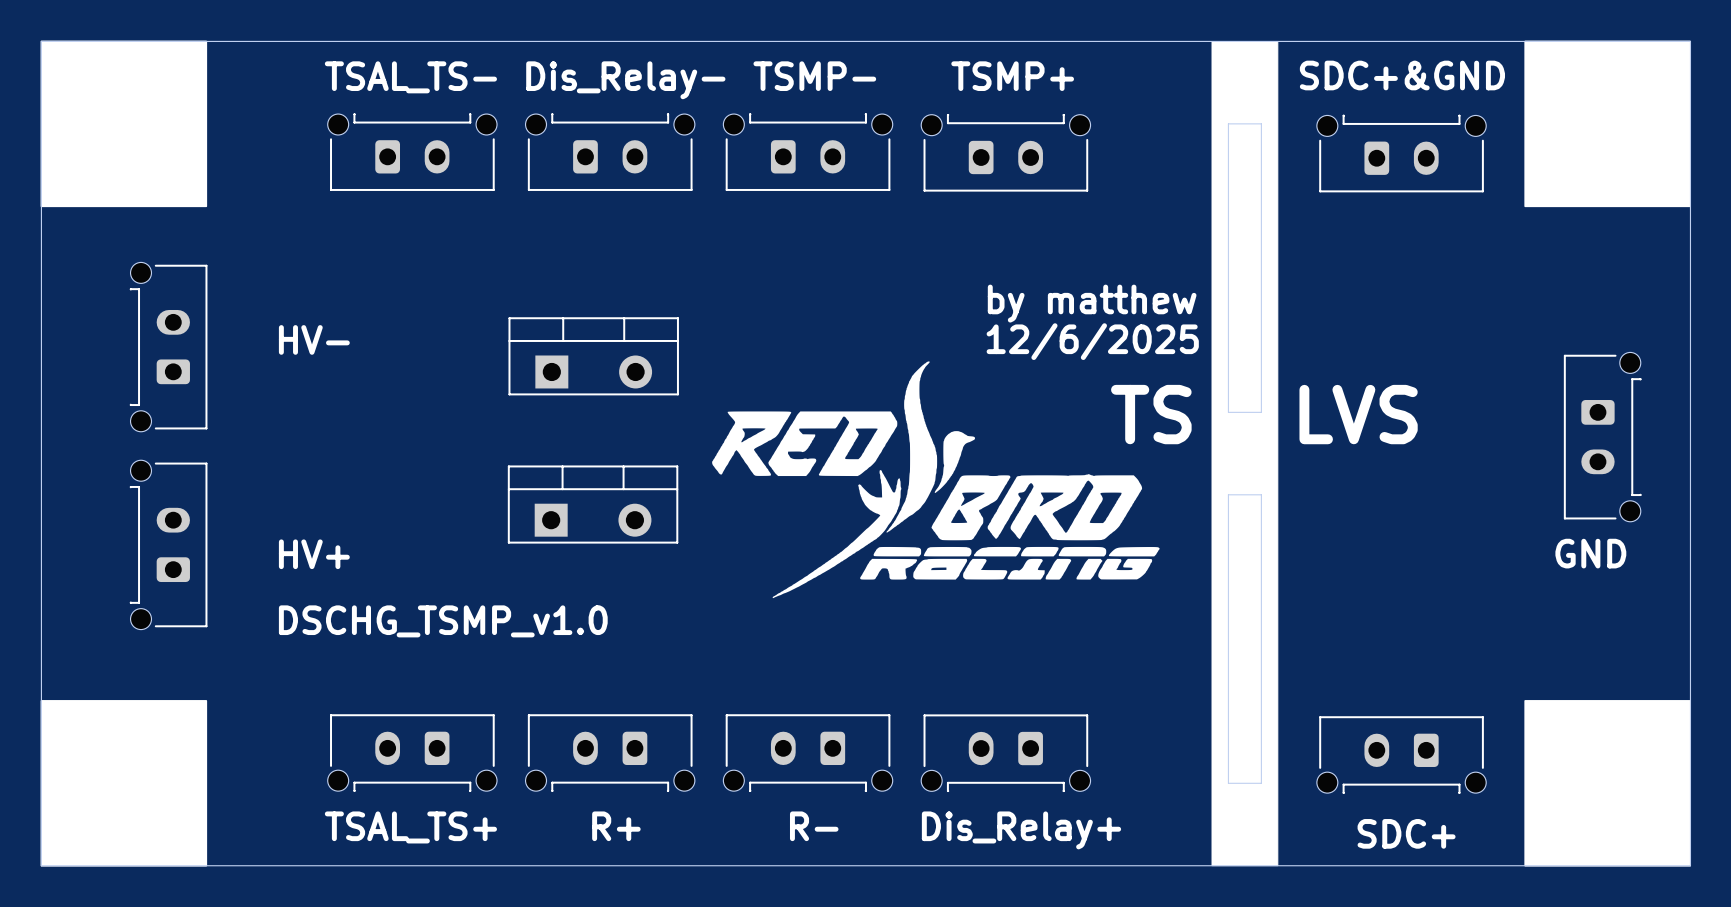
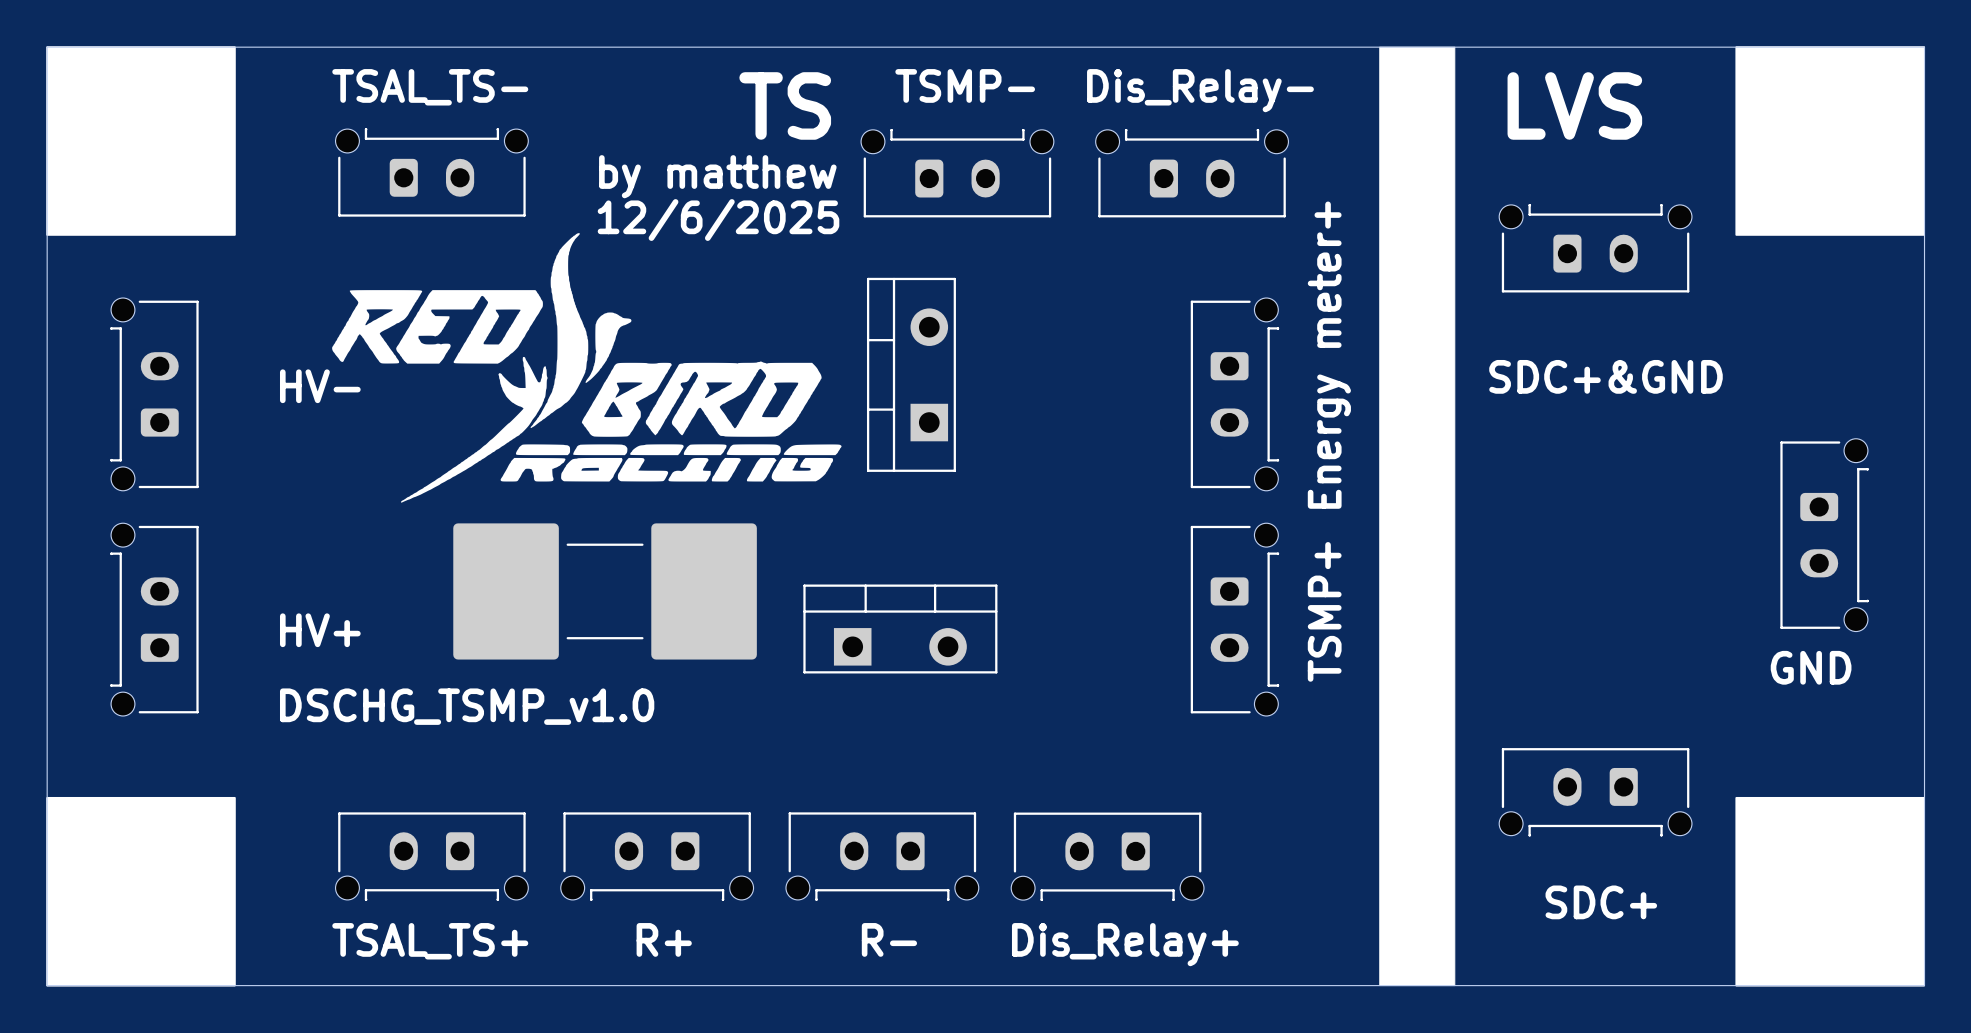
text position: SDC+&GND (1402, 75) -> SDC+&GND (1605, 376)
text position: TSMP- (814, 76) -> TSMP- (965, 85)
text: TSMP+ (1012, 76) -> Dis_Relay- (1200, 90)
text position: TSAL_TS- (410, 77) -> TSAL_TS- (430, 87)
text: Dis_Relay- (625, 80) -> none
text: none -> TS (785, 105)
board edge: (1228, 123) (1261, 123) (1261, 412) (1228, 412) (1228, 123) -> none
part position: (412, 152) -> (431, 172)
part: (610, 152) -> none
part position: (808, 152) -> (957, 173)
part position: (1005, 152) -> (1192, 173)
part position: (1401, 153) -> (1595, 248)
text: none -> by matthew (717, 176)
text: none -> 12/6/2025 (718, 220)
drawing: none -> [332, 233, 842, 503]
text: by matthew (1092, 303) -> none
text: none -> Energy meter+ (1329, 355)
part: none -> (911, 374)
text position: HV- (314, 339) -> HV- (320, 386)
text: 12/6/2025 (1092, 341) -> none
part: none -> (1234, 394)
part position: (168, 347) -> (154, 394)
part: (593, 356) -> none
drawing: [712, 361, 1160, 599] -> none
text: TS (1151, 414) -> none
text position: LVS (1358, 414) -> LVS (1574, 105)
part position: (1602, 437) -> (1824, 535)
board edge: (1228, 494) (1228, 783) (1261, 783) (1261, 494) (1228, 494) -> none
part: (593, 504) -> none
part: none -> (605, 591)
text: none -> TSMP+ (1324, 611)
part position: (168, 544) -> (154, 619)
part: none -> (1234, 619)
part: none -> (900, 628)
text position: GND (1590, 553) -> GND (1811, 667)
text position: HV+ (314, 554) -> HV+ (320, 630)
text position: DSCHG_TSMP_v1.0 (443, 621) -> DSCHG_TSMP_v1.0 (467, 706)
part position: (412, 753) -> (431, 856)
part position: (610, 753) -> (657, 856)
part position: (808, 753) -> (882, 856)
part position: (1005, 753) -> (1107, 856)
part position: (1401, 755) -> (1595, 792)
text position: R+ (616, 826) -> R+ (664, 939)
text position: R- (814, 826) -> R- (889, 939)
text position: TSAL_TS+ (410, 827) -> TSAL_TS+ (430, 941)
text position: Dis_Relay+ (1021, 830) -> Dis_Relay+ (1125, 944)
text position: SDC+ (1406, 833) -> SDC+ (1601, 902)

